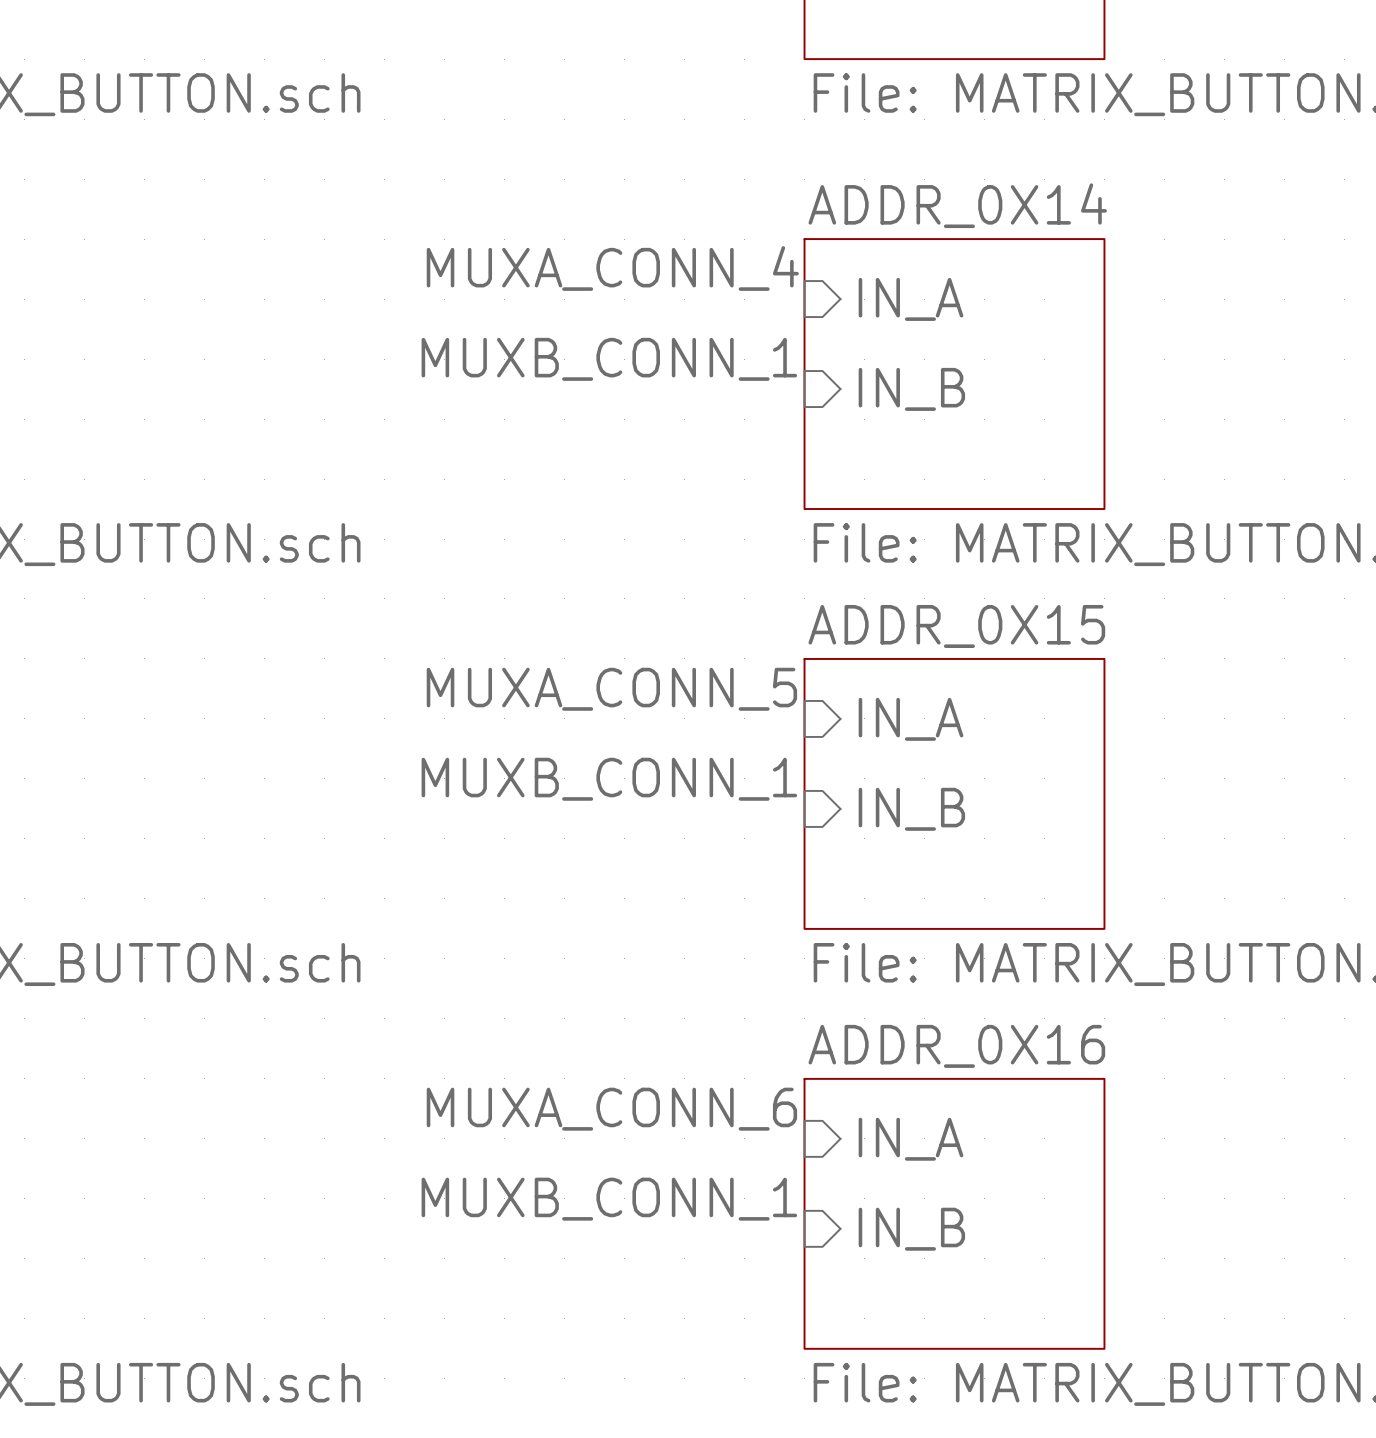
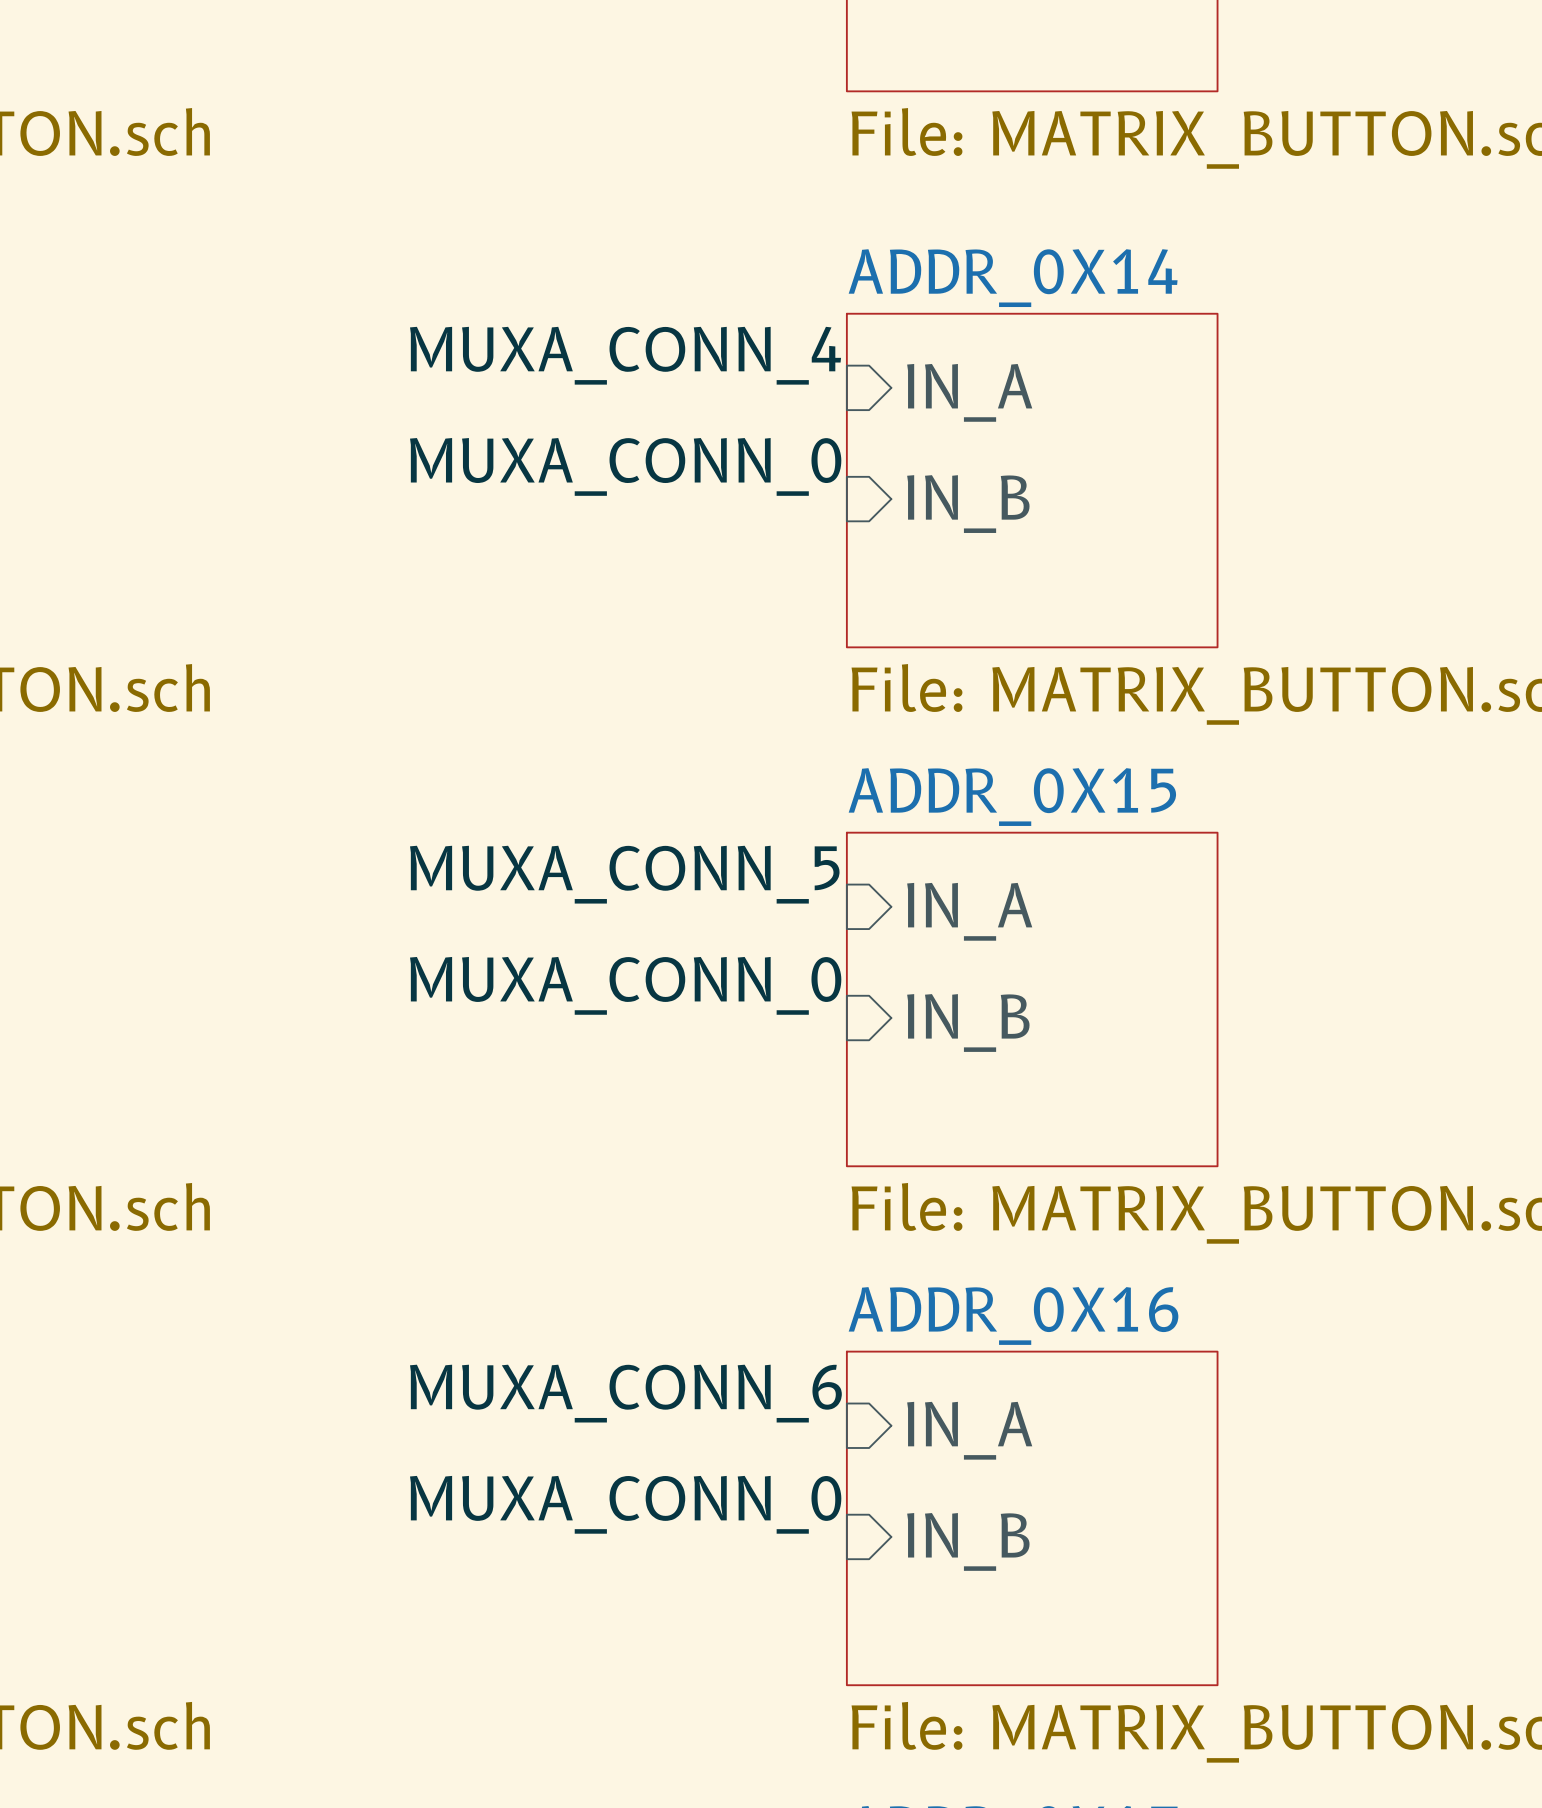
label: MUXB_CONN_1 (609, 359) -> MUXA_CONN_0 (625, 466)
label: MUXB_CONN_1 (609, 779) -> MUXA_CONN_0 (625, 985)
label: MUXB_CONN_1 (609, 1199) -> MUXA_CONN_0 (625, 1504)

